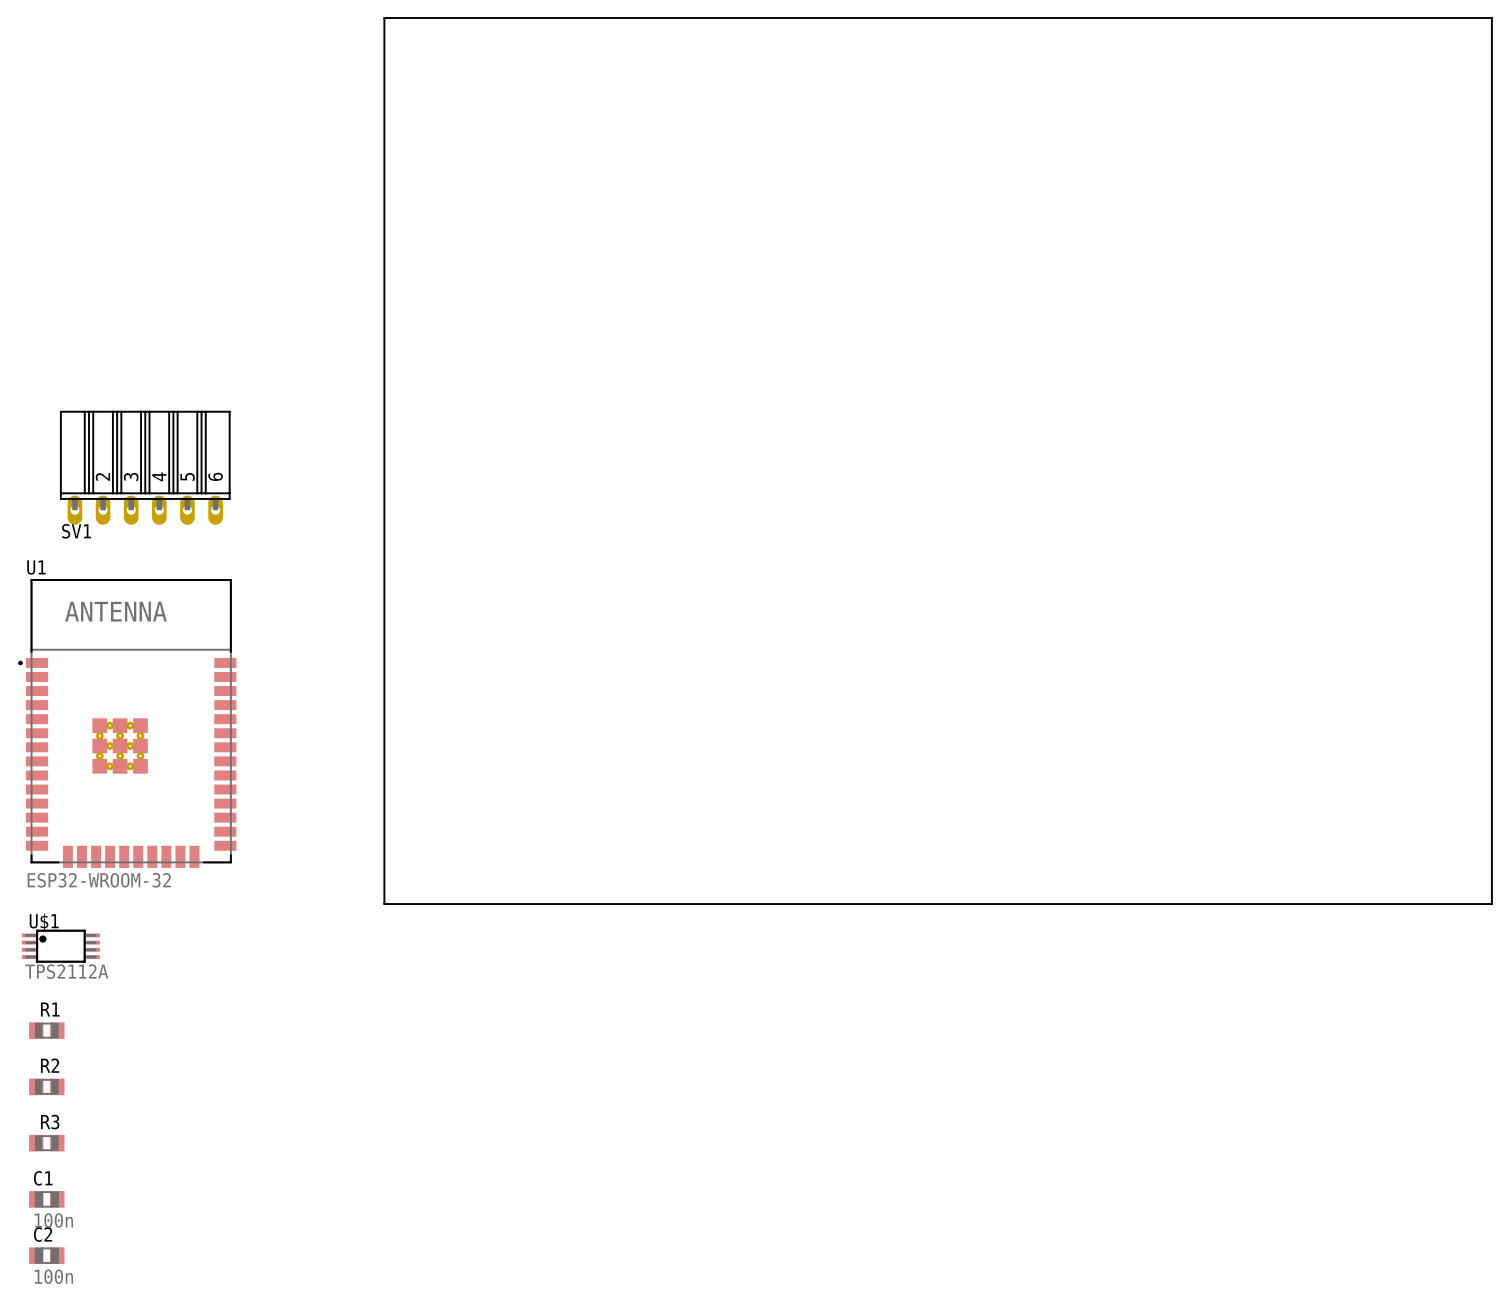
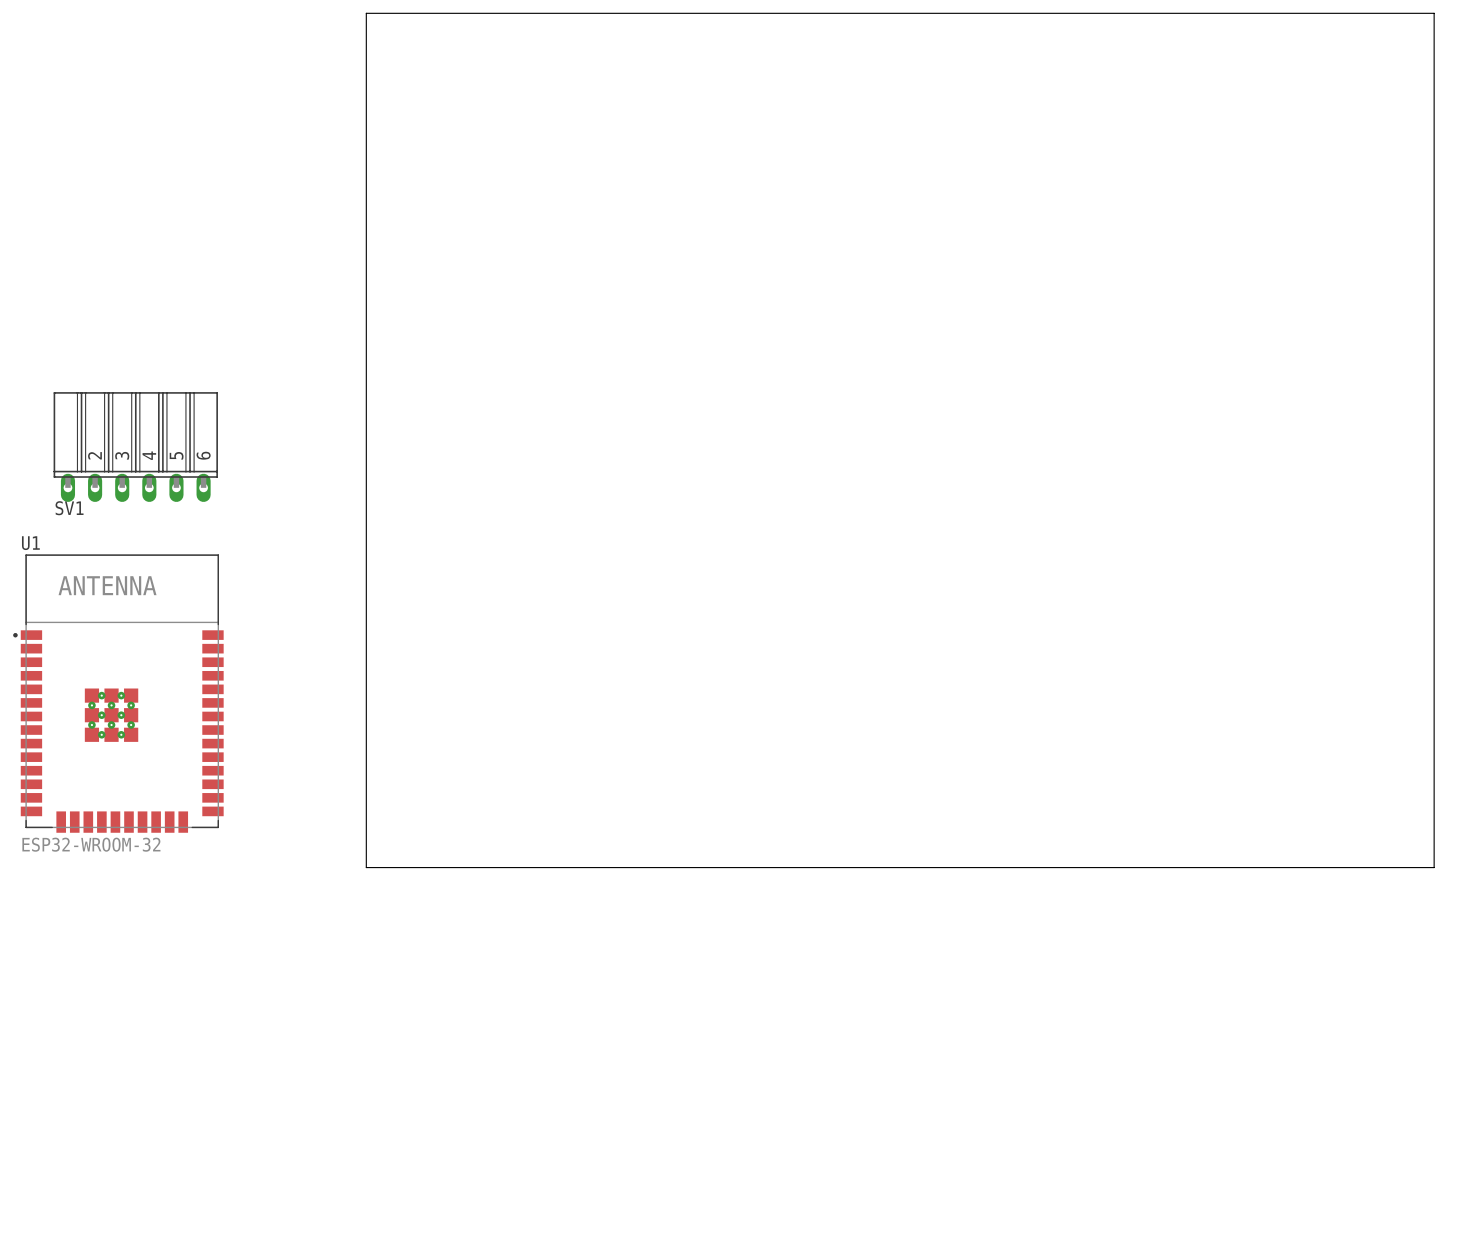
U$1: TPS2112A (60, 946) -> none
R1: (46, 1030) -> none
R2: (46, 1086) -> none
R3: (46, 1143) -> none
C1: 100n (46, 1199) -> none
C2: 100n (46, 1255) -> none

